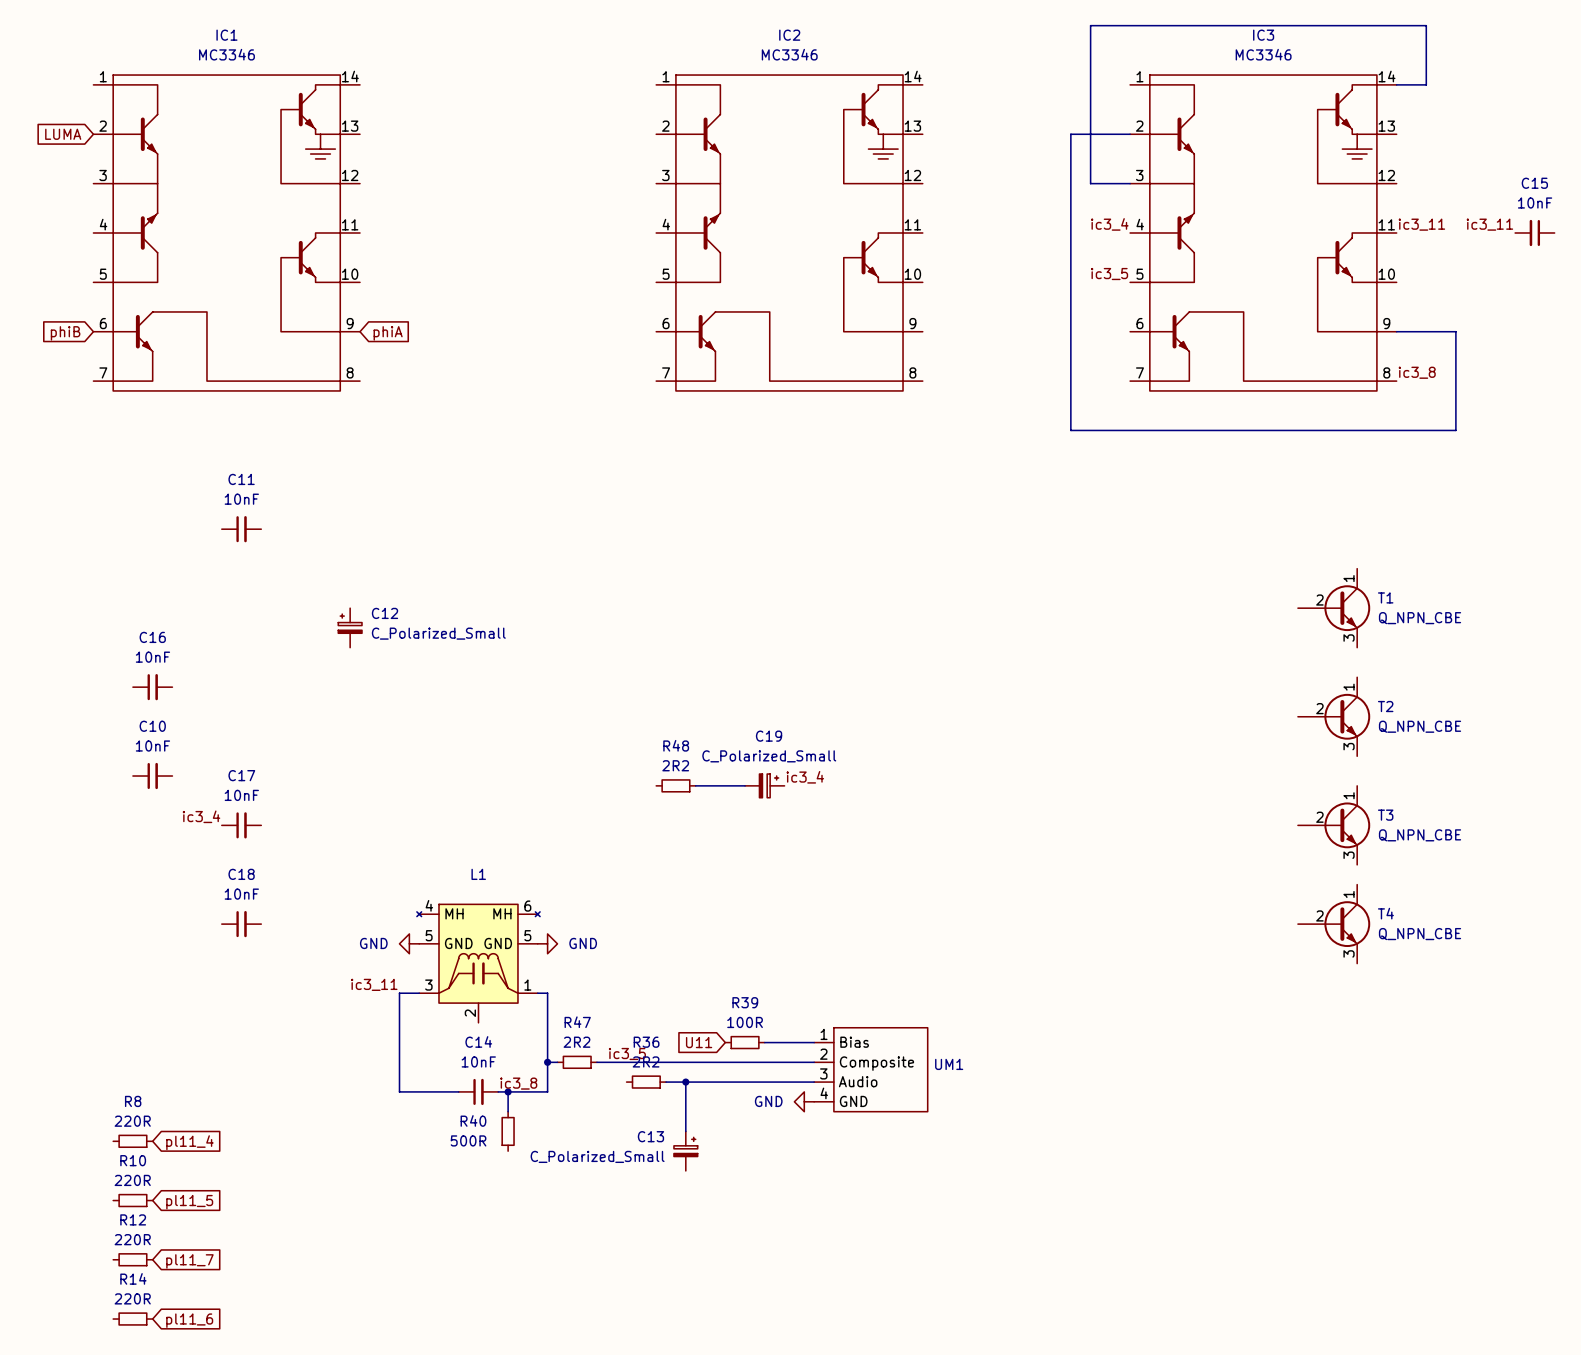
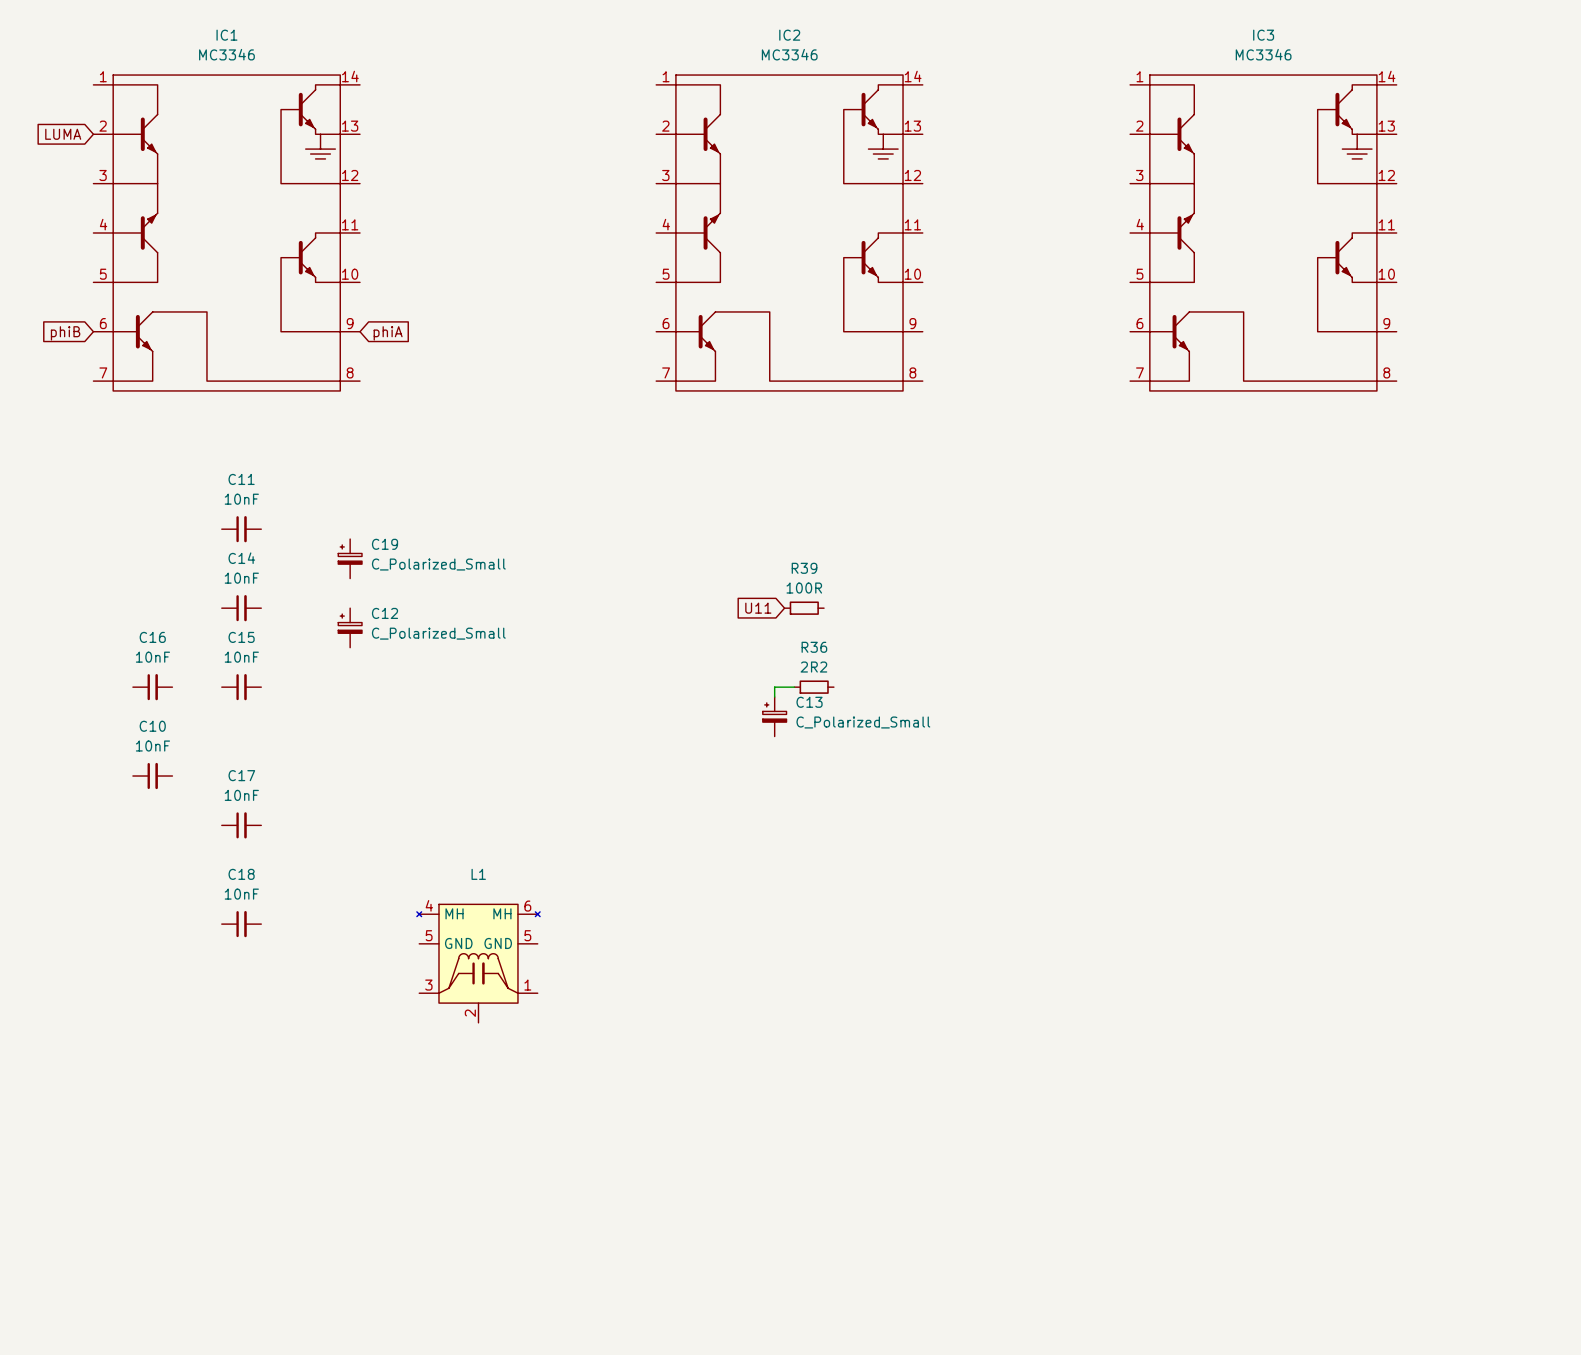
wire: (1396, 84) (1426, 84) (1426, 25) (1090, 25) (1090, 183) (1130, 183) -> none
wire: (1130, 134) (1070, 134) (1070, 430) (1455, 430) (1455, 331) (1396, 331) -> none
label: ic3_4 (1109, 224) -> none
label: ic3_11 (1421, 224) -> none
label: ic3_11 (1489, 224) -> none
C15 rotation: 0° (1534, 232) -> 180° (241, 687)
C15 position: (1534, 232) -> (241, 687)
label: ic3_5 (1109, 274) -> none
label: ic3_8 (1417, 372) -> none
global label: none -> U11 (758, 608)
T1: Q_NPN_CBE (1334, 608) -> none
wire: none -> (794, 687) (774, 687) (774, 697)
T2: Q_NPN_CBE (1334, 716) -> none
C19 name position: C19 (769, 736) -> C19 (385, 544)
C19 value position: C_Polarized_Small (769, 756) -> C_Polarized_Small (438, 564)
label: ic3_4 (805, 777) -> none
R48: 2R2 (675, 785) -> none
wire: (695, 785) (745, 785) -> none
C19 position: (764, 785) -> (350, 558)
C19 rotation: 0° (769, 785) -> 90° counterclockwise (350, 554)
label: ic3_4 (201, 816) -> none
T3: Q_NPN_CBE (1334, 825) -> none
T4: Q_NPN_CBE (1334, 924) -> none
power symbol: GND (409, 943) -> none
power symbol: GND (547, 943) -> none
label: ic3_11 (374, 984) -> none
wire: (419, 993) (399, 993) (399, 1091) (458, 1091) -> none
wire: (537, 993) (547, 993) (547, 1091) (498, 1091) -> none
global label: U11 (699, 1042) -> none
R39 position: (745, 1042) -> (804, 608)
wire: (764, 1042) (814, 1042) -> none
label: ic3_5 (627, 1053) -> none
wire: (547, 1062) (557, 1062) -> none
junction: (547, 1062) -> none
R47: 2R2 (577, 1062) -> none
wire: (596, 1062) (814, 1062) -> none
UM1: (870, 1069) -> none
R36 position: (646, 1082) -> (814, 687)
wire: (666, 1082) (814, 1082) -> none
wire: (685, 1082) (685, 1131) -> none
junction: (685, 1082) -> none
label: ic3_8 (518, 1083) -> none
C14 position: (478, 1091) -> (241, 608)
wire: (508, 1091) (508, 1111) -> none
junction: (508, 1091) -> none
power symbol: GND (804, 1101) -> none
R40: 500R (508, 1131) -> none
R8: 220R (132, 1141) -> none
global label: pl11_4 (189, 1142) -> none
C13 flip: as is (685, 1146) -> left-right (774, 712)
C13 position: (685, 1151) -> (774, 716)
R10: 220R (132, 1200) -> none
global label: pl11_5 (189, 1202) -> none
R12: 220R (132, 1259) -> none
global label: pl11_7 (189, 1261) -> none
R14: 220R (132, 1319) -> none
global label: pl11_6 (189, 1320) -> none

